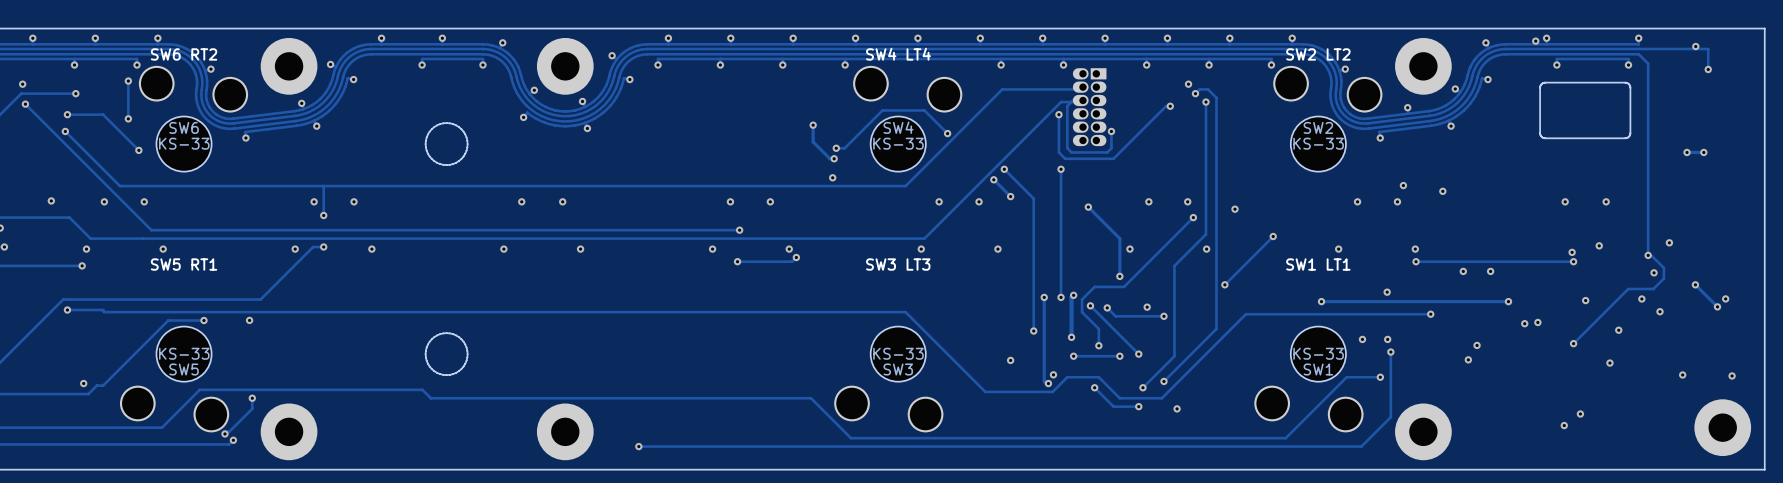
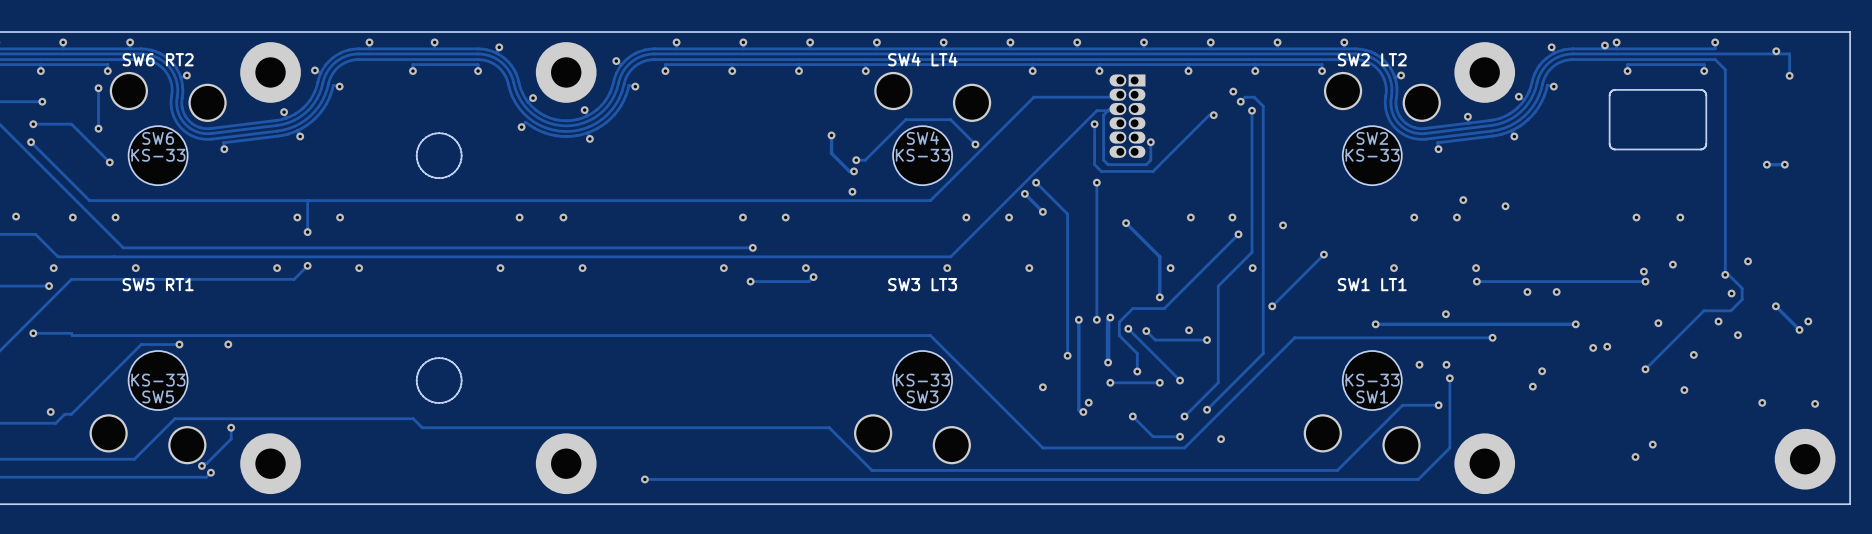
track: (323, 247) (313, 247) (260, 299) (63, 299) -> (307, 265) (294, 279) (71, 279) (28, 322)
track: (985, 391) (1052, 391) (1067, 377) (1098, 377) (1119, 398) (1161, 398) -> (1015, 420) (1042, 447) (1184, 447) (1204, 427)

